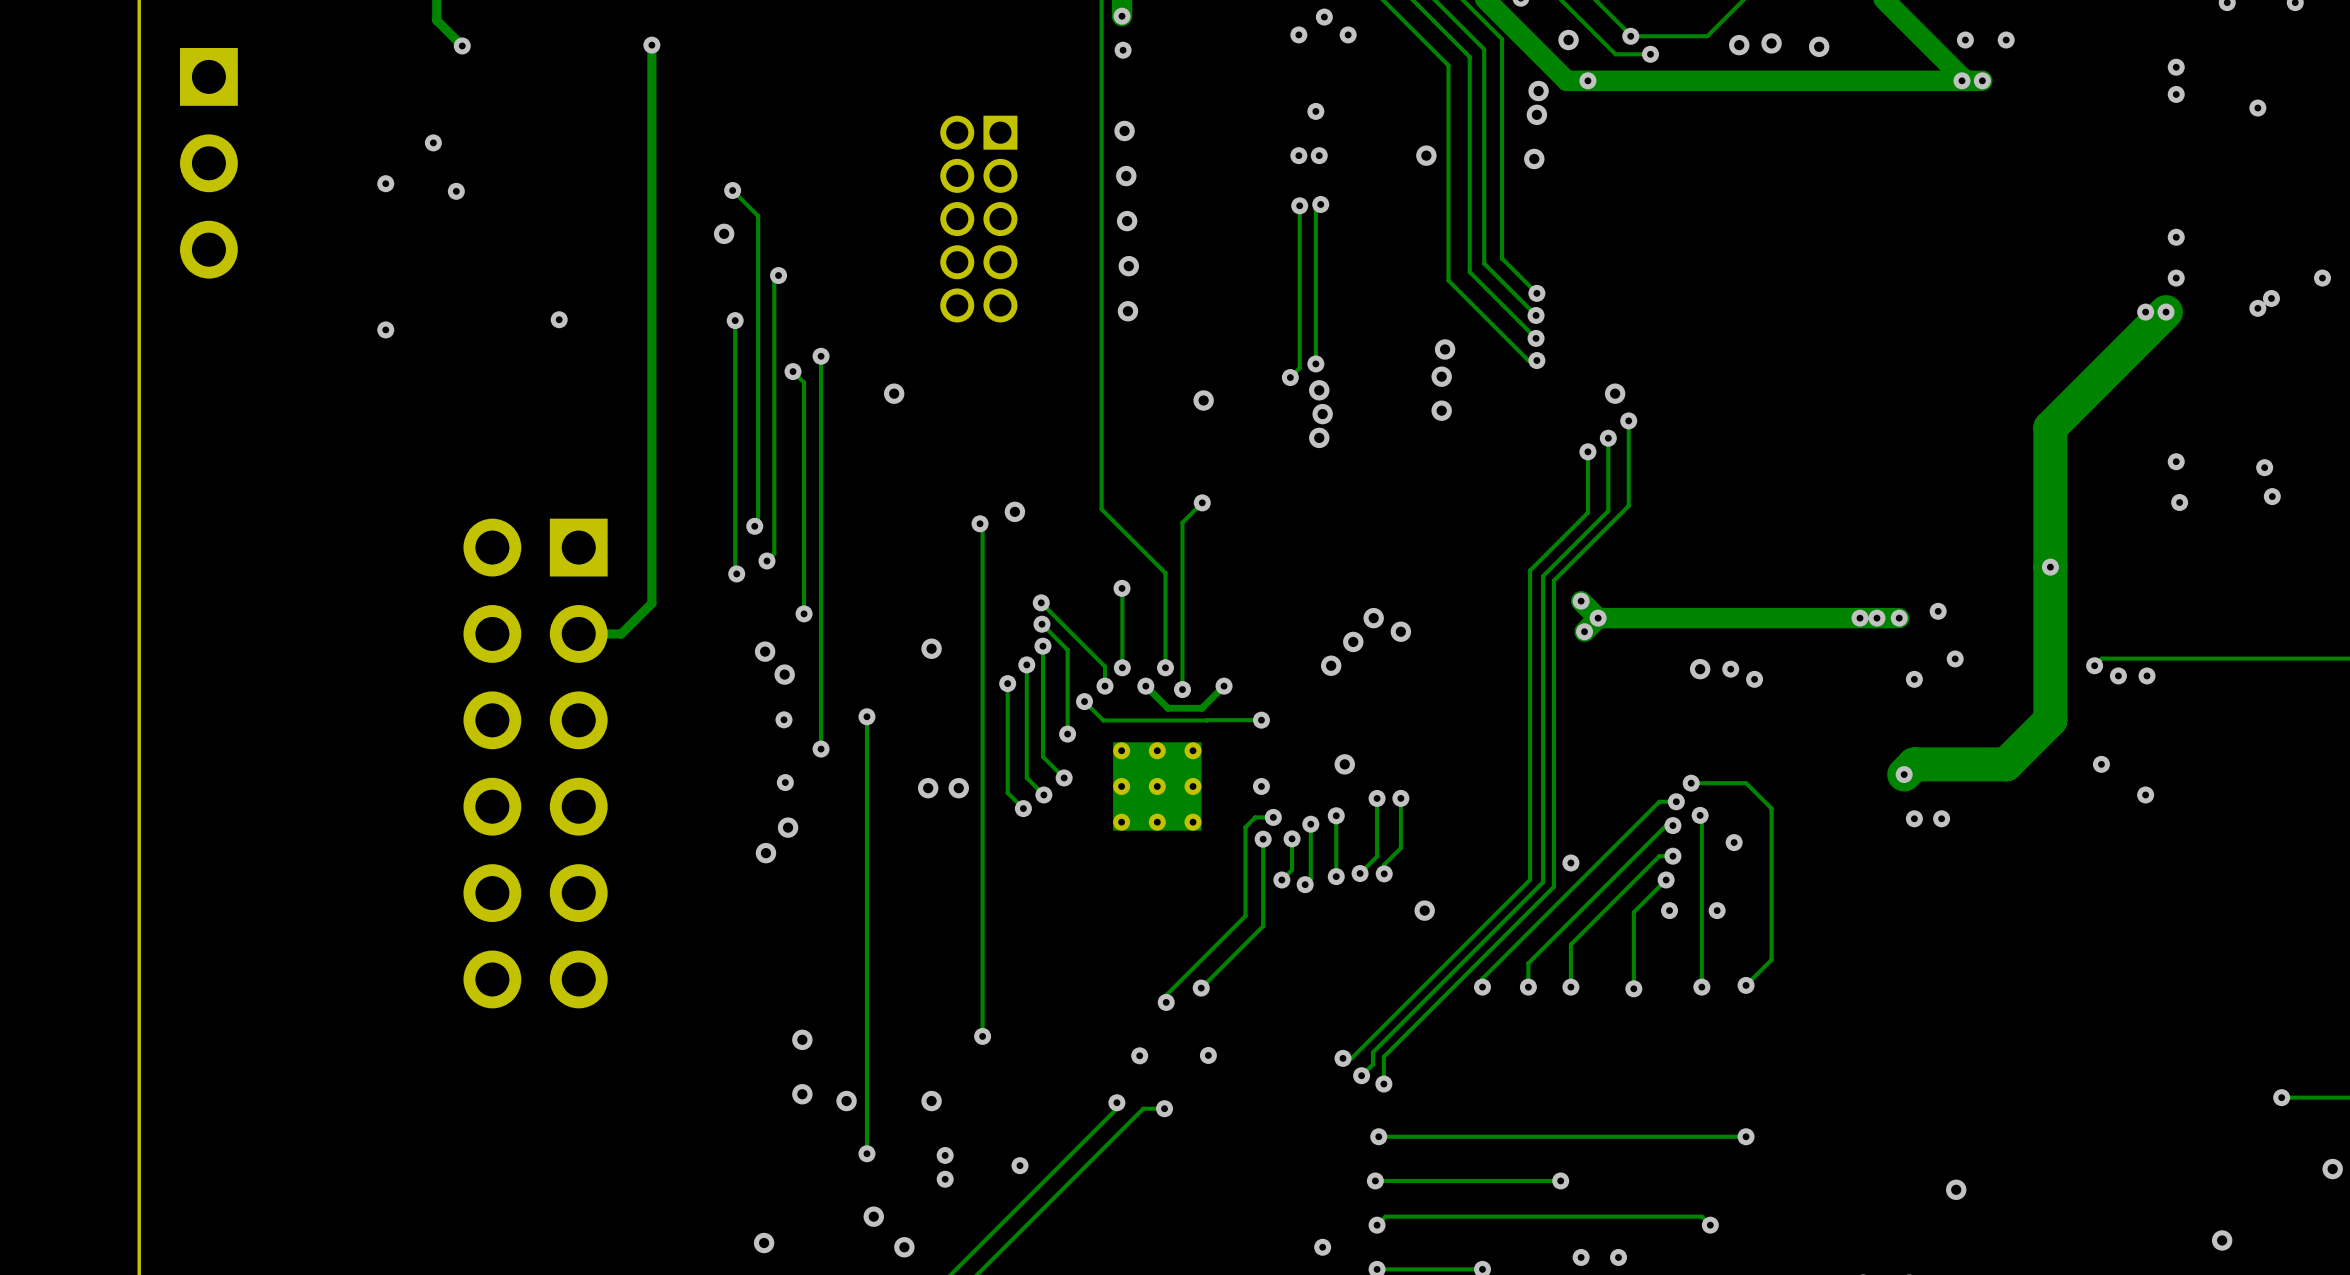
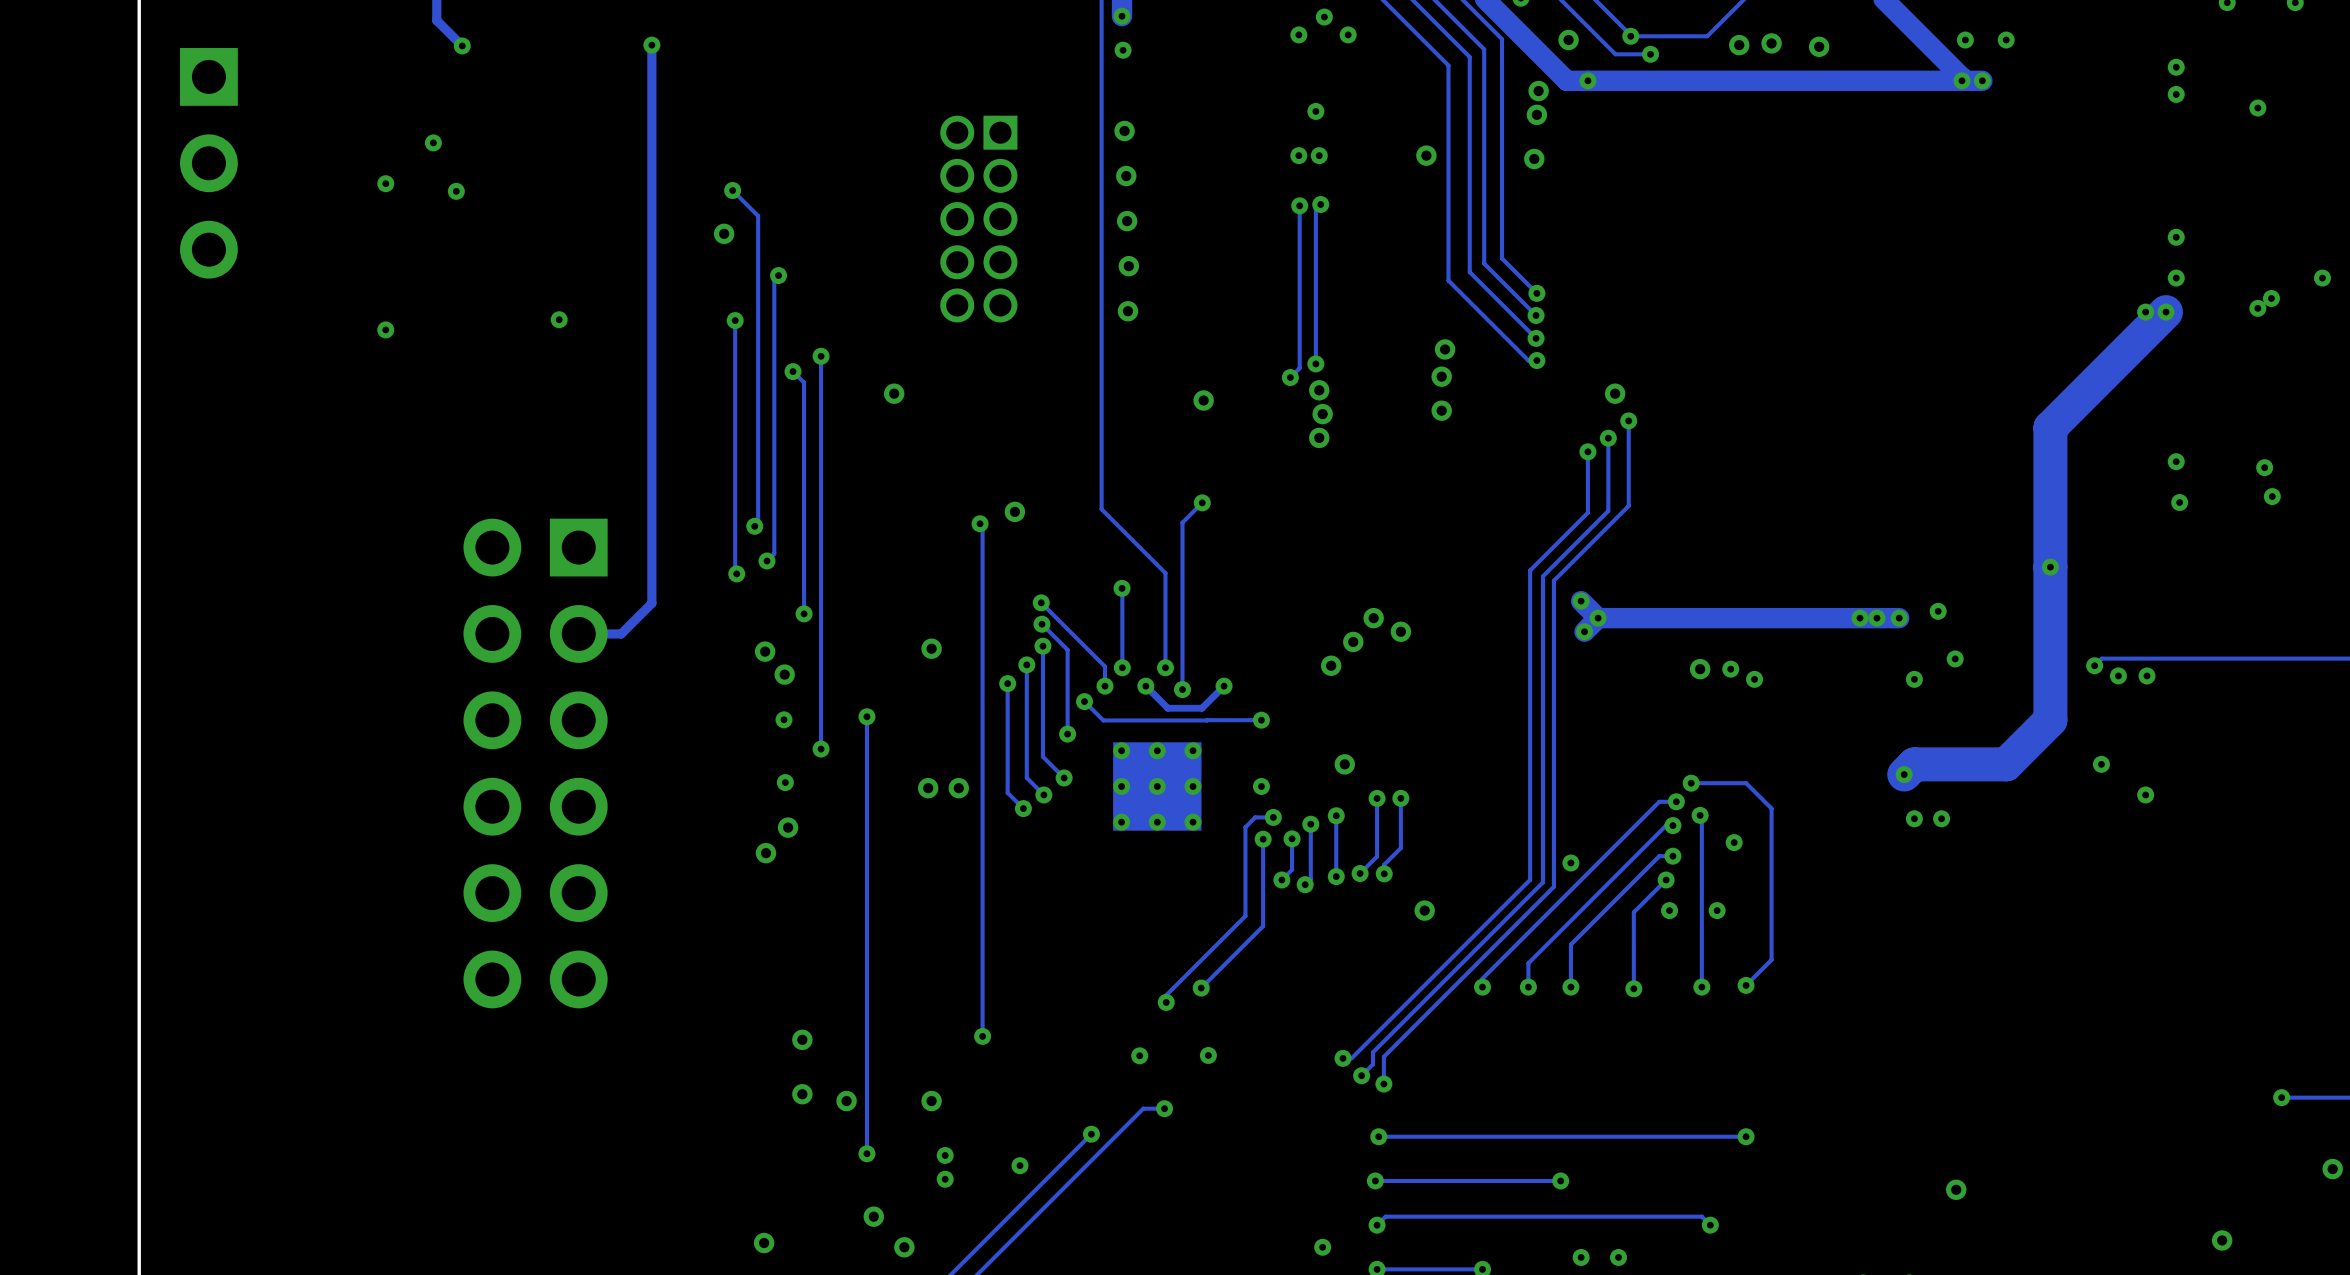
track: (1116, 1102) (1116, 1108) (1091, 1134) -> none
via position: (1116, 1102) -> (1091, 1134)

